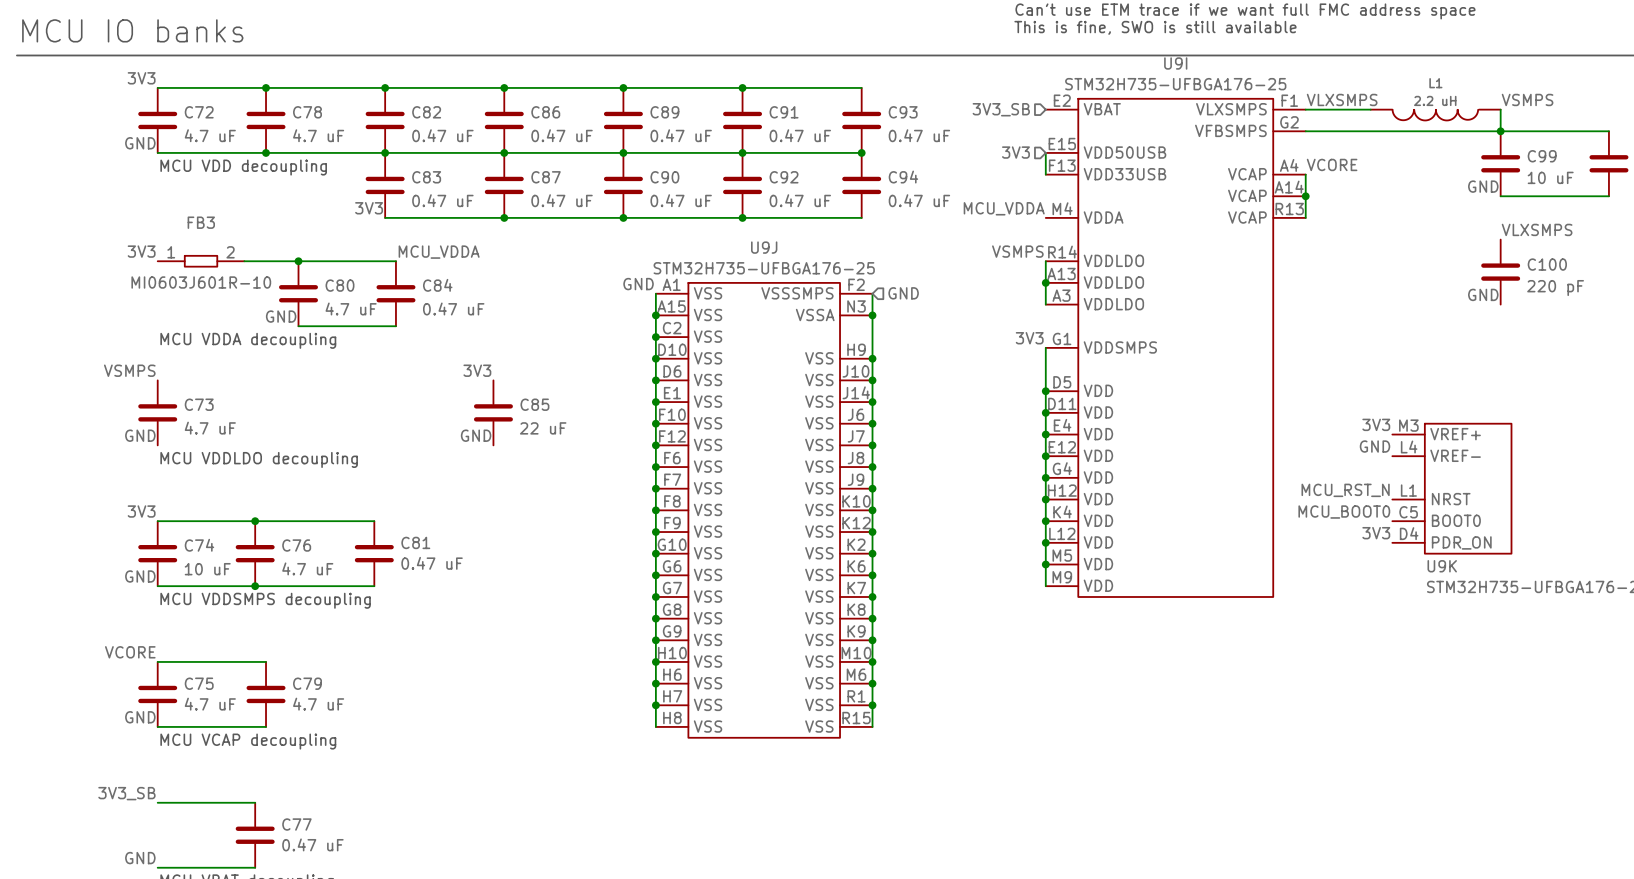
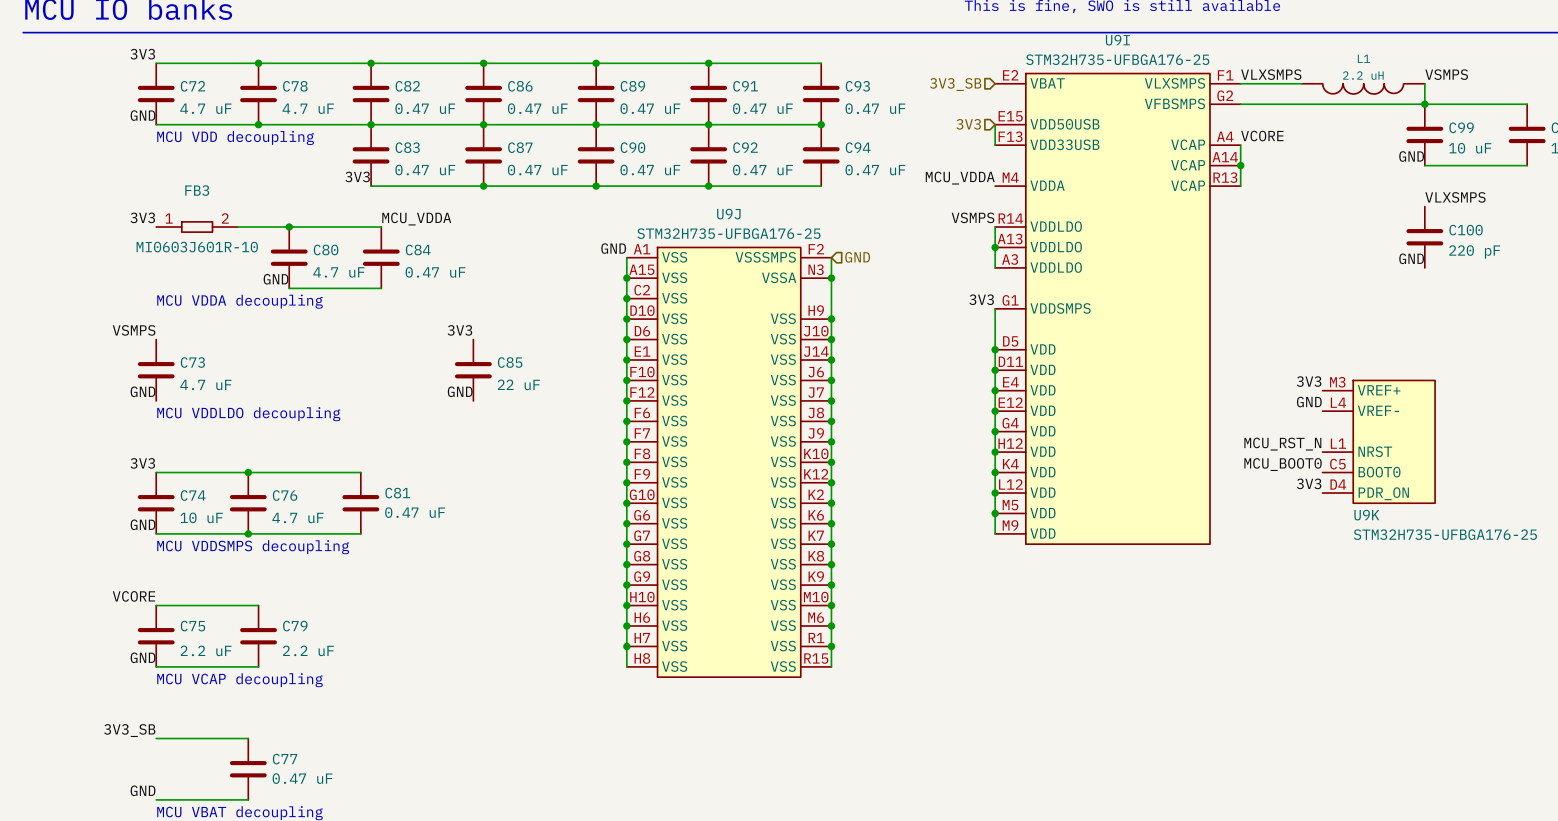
C75 value: 4.7 uF (210, 704) -> 2.2 uF (206, 650)
C79 value: 4.7 uF (318, 704) -> 2.2 uF (308, 650)

